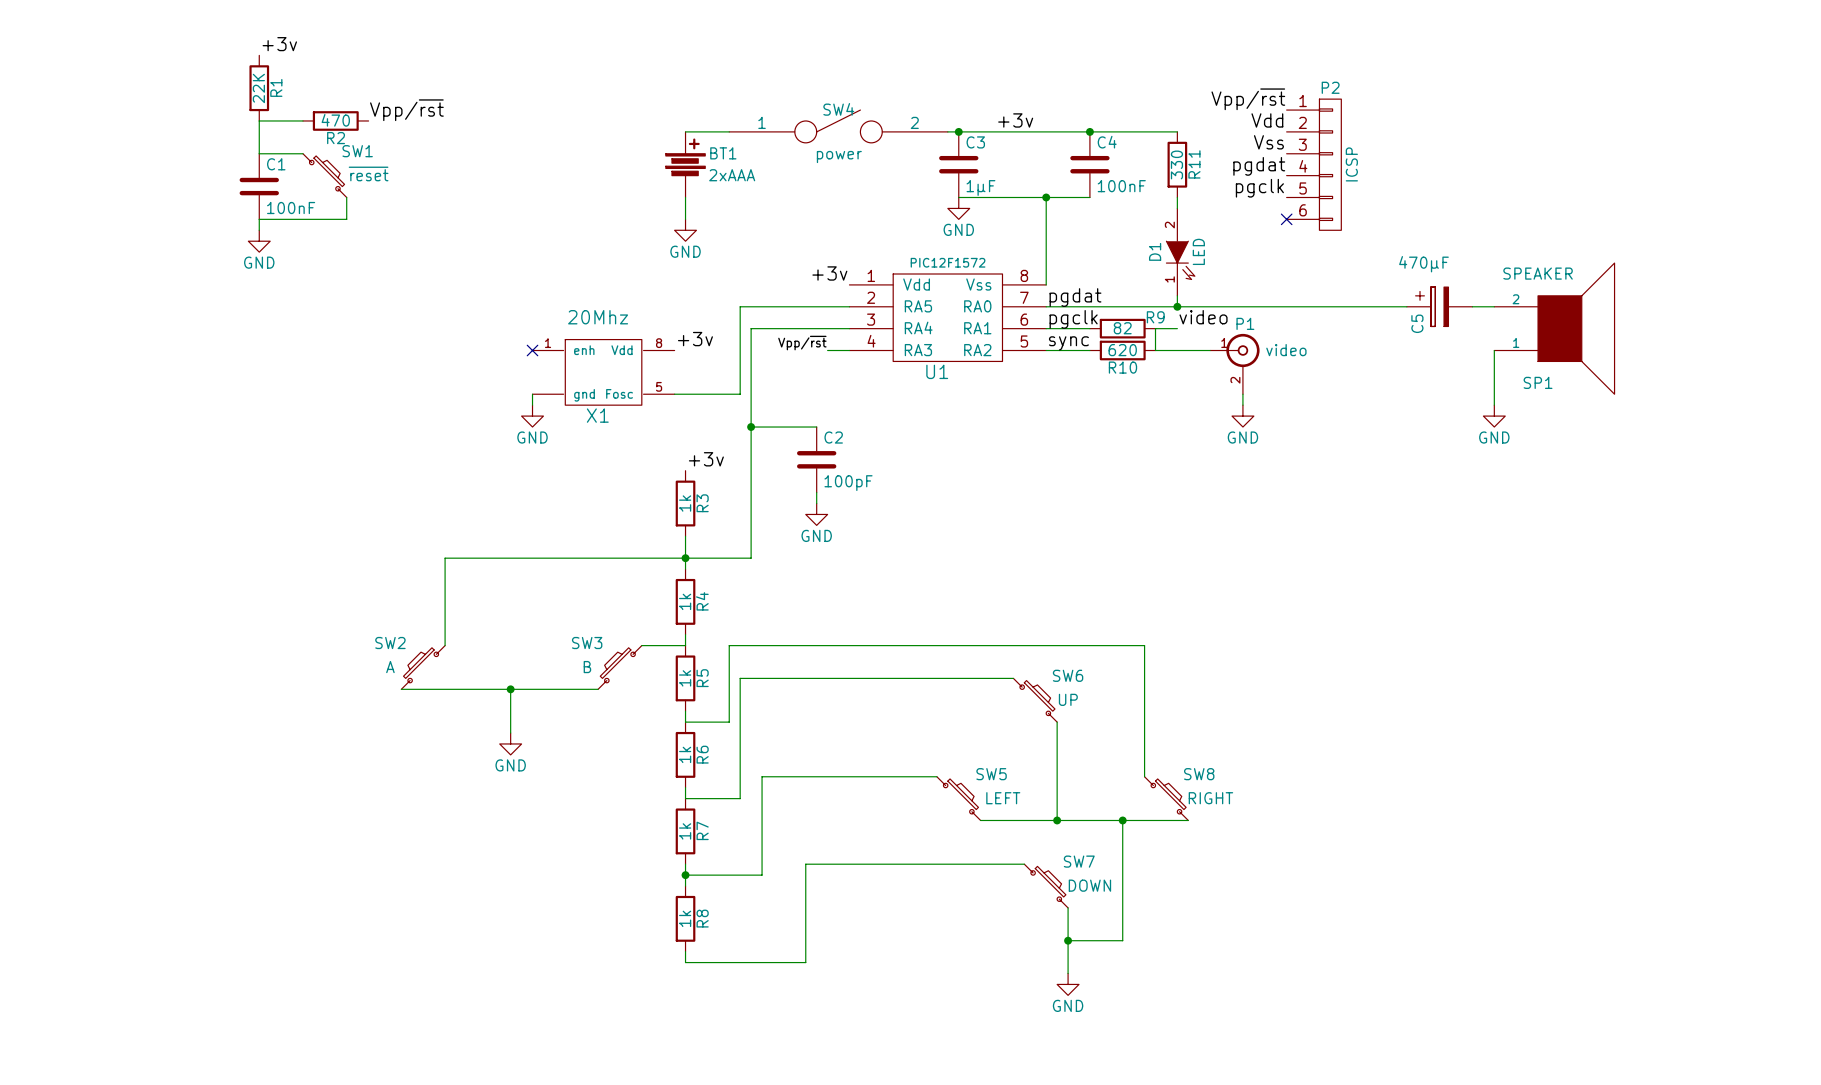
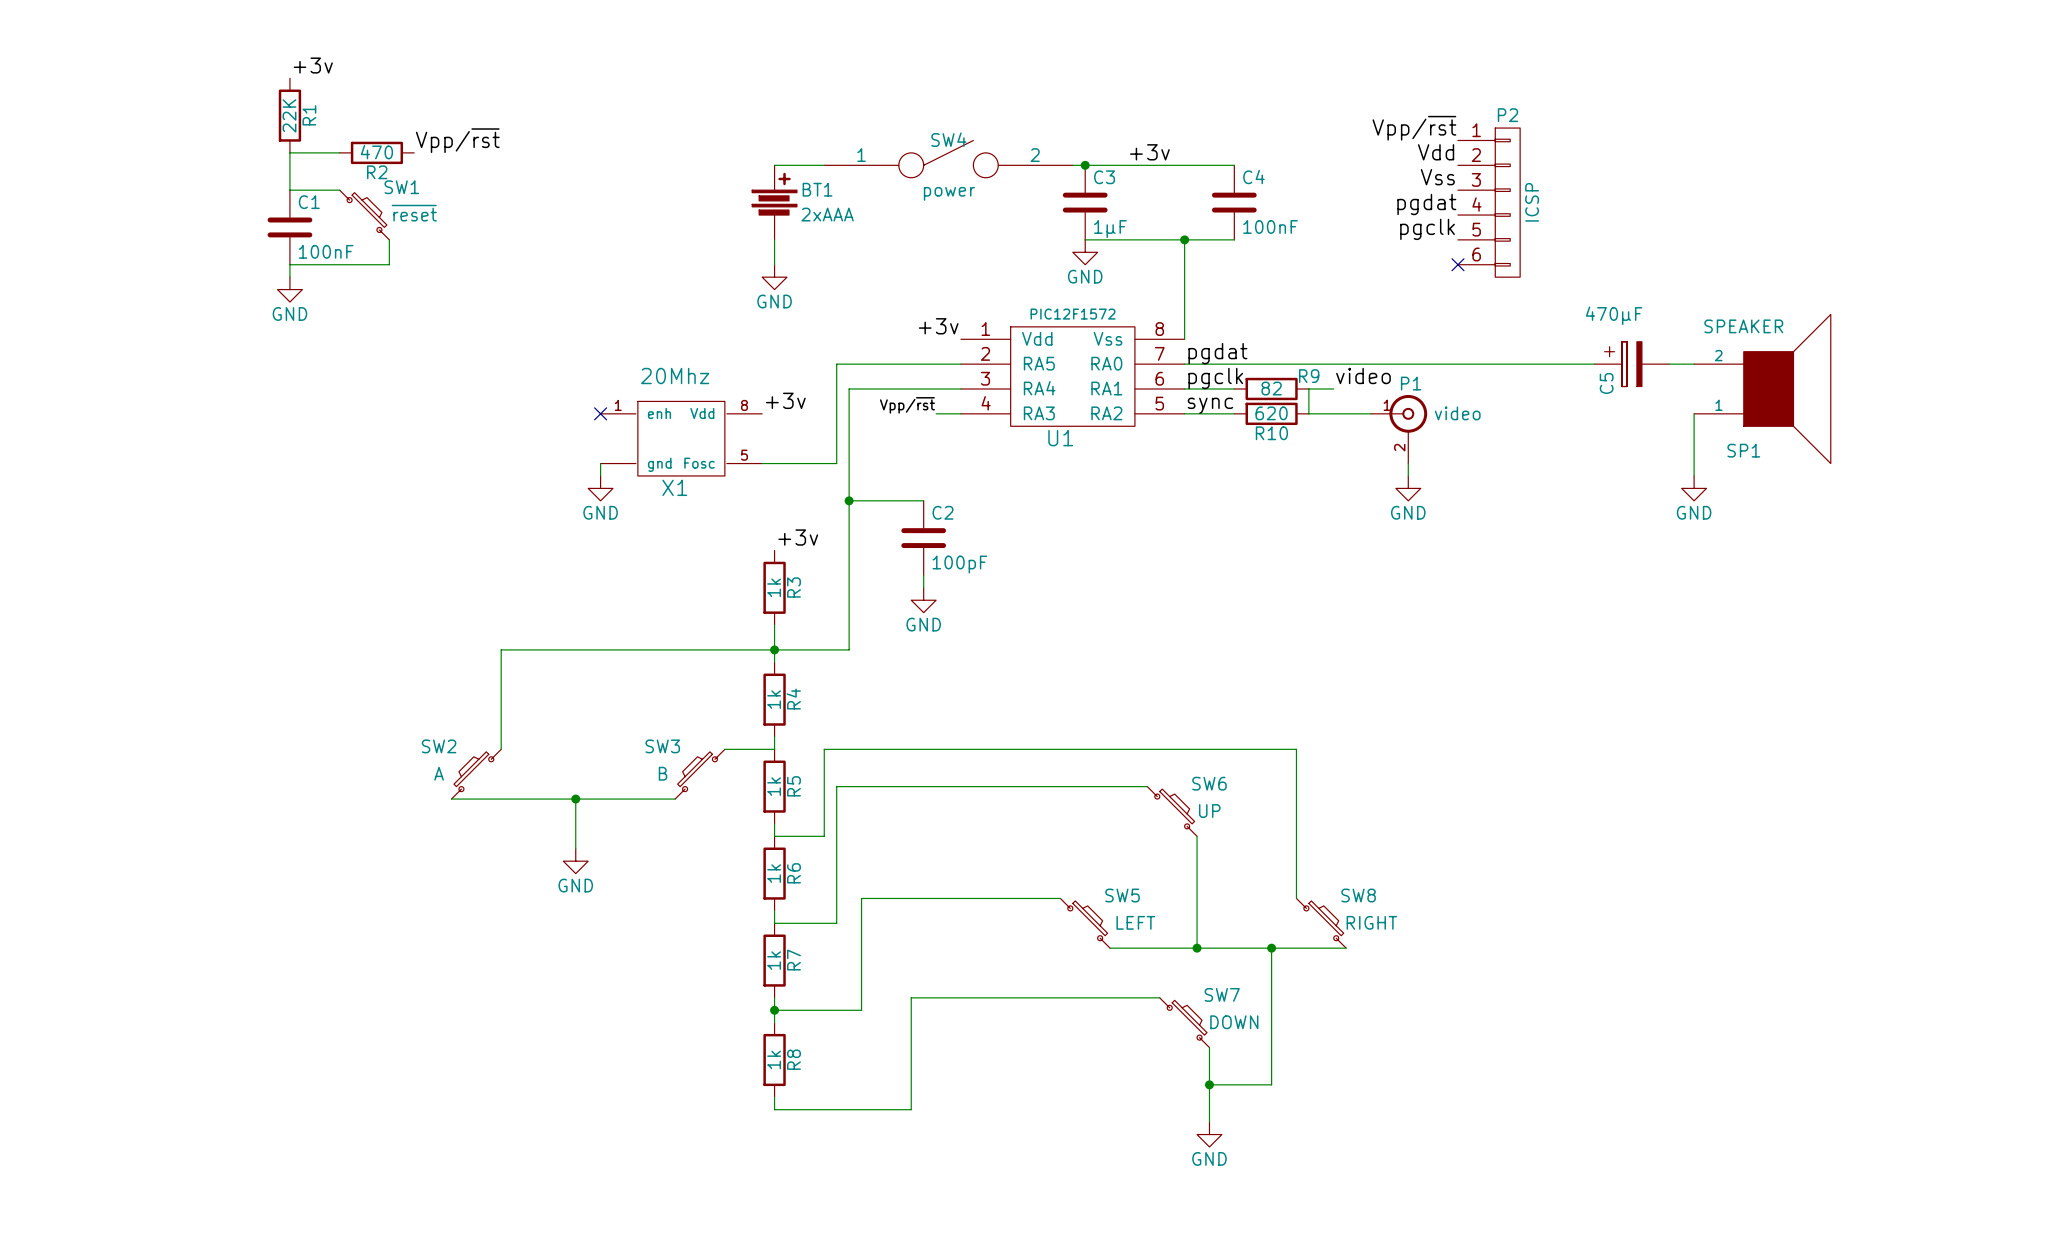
wire: (1089, 131) (1177, 131) -> none
junction: (1089, 131) -> none
R11: 330 (1177, 164) -> none
wire: (1177, 197) (1177, 208) -> none
D1: LED (1180, 252) -> none
wire: (1177, 295) (1177, 306) -> none
junction: (1177, 306) -> none

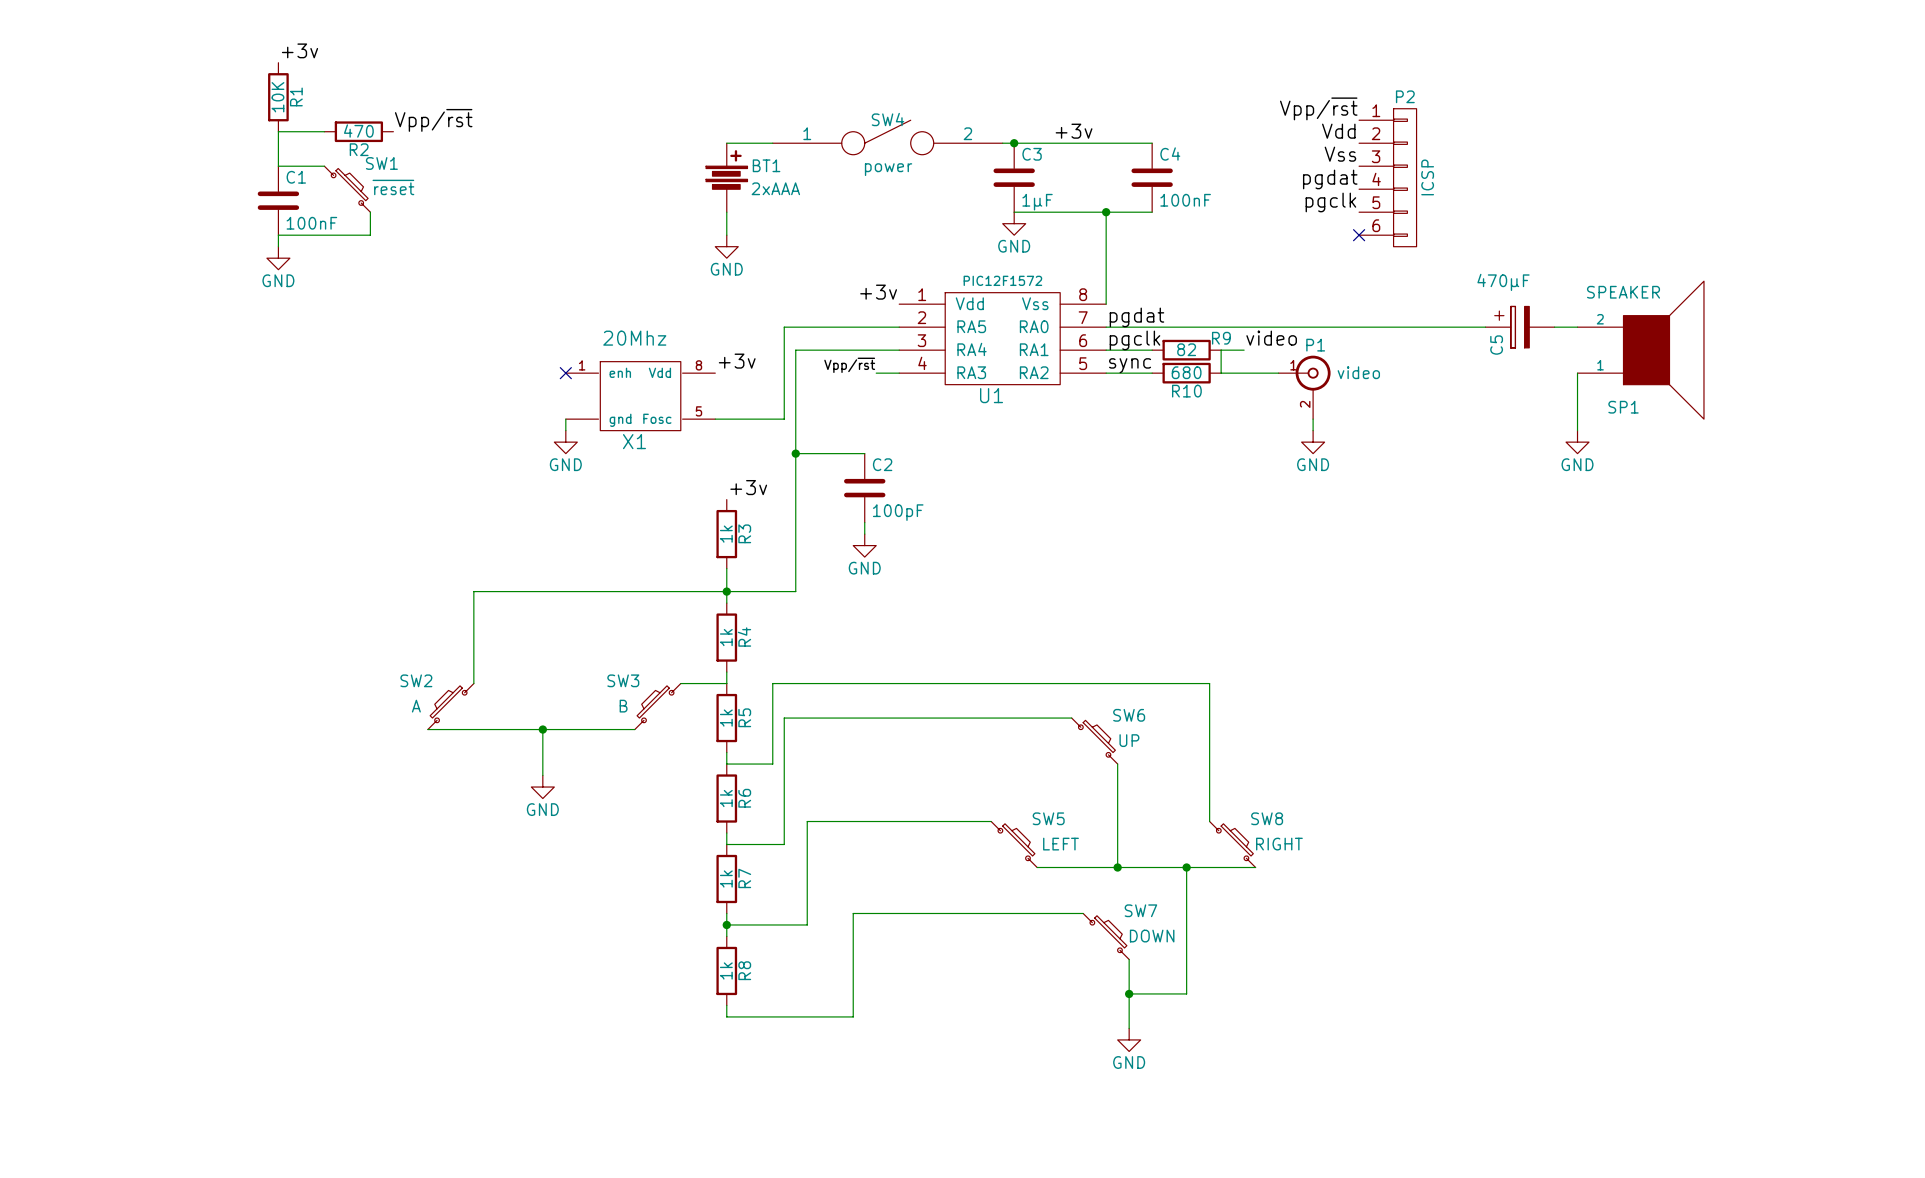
R1 value: 22K (289, 115) -> 10K (277, 97)
R10 value: 620 (1271, 413) -> 680 (1186, 372)

